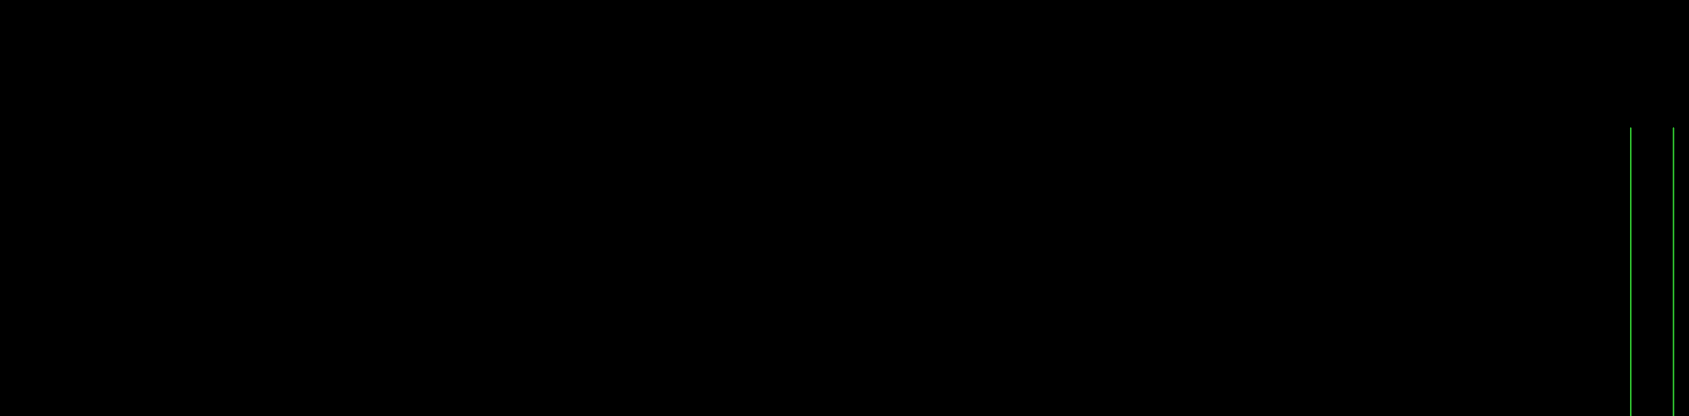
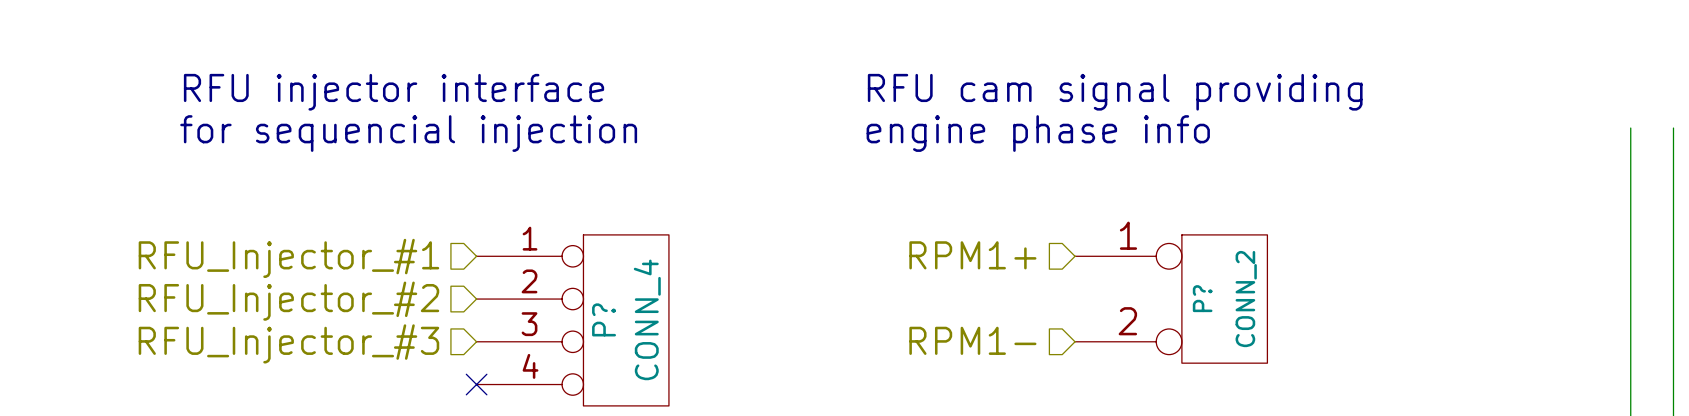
text: none -> RFU injector interface (394, 92)
text: none -> RFU cam signal providing (1115, 92)
text: none -> for sequencial injection (408, 133)
text: none -> engine phase info (1038, 133)
hierarchical label: none -> RPM1+ (972, 255)
hierarchical label: none -> RFU_Injector_#1 (288, 258)
P?: none -> CONN_2 (1171, 299)
hierarchical label: none -> RFU_Injector_#2 (288, 301)
P?: none -> CONN_4 (572, 320)
hierarchical label: none -> RPM1- (972, 340)
hierarchical label: none -> RFU_Injector_#3 (288, 343)
no-connect mark: none -> (476, 384)

